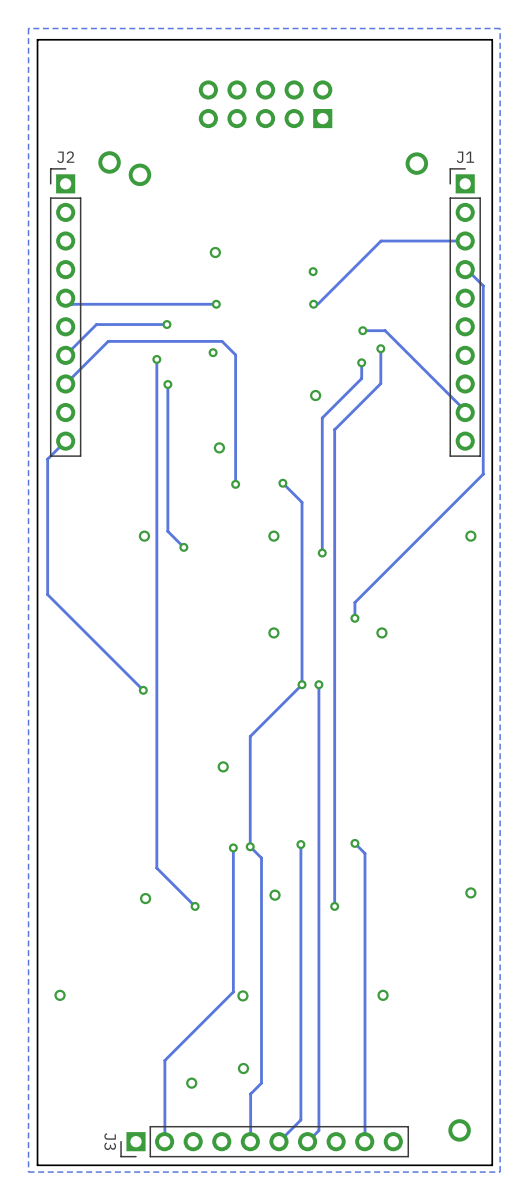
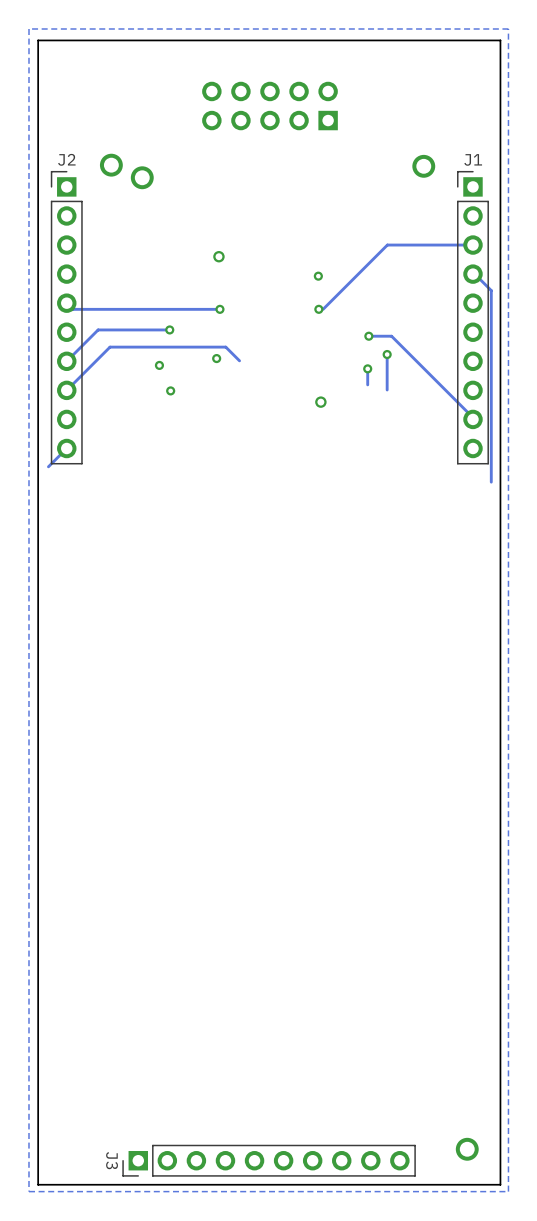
track: (235, 354) (235, 484) -> none
track: (156, 359) (156, 868) (195, 906) -> none
track: (361, 378) (322, 417) (322, 553) -> none
track: (380, 383) (334, 429) -> none
track: (167, 384) (167, 531) (183, 547) -> none
track: (334, 429) (334, 906) -> none
via: (219, 447) -> none
track: (47, 459) (47, 594) (143, 690) -> none
track: (483, 474) (354, 602) (354, 618) -> none
track: (282, 483) (302, 502) (302, 684) (250, 736) (250, 846) (261, 858) (261, 1083) (250, 1094) (250, 1141) -> none
via: (282, 483) -> none
via: (235, 484) -> none
via: (144, 536) -> none
via: (273, 536) -> none
via: (470, 536) -> none
via: (183, 547) -> none
via: (322, 553) -> none
via: (354, 618) -> none
via: (273, 632) -> none
via: (381, 632) -> none
via: (302, 684) -> none
track: (318, 684) (318, 1130) (307, 1141) -> none
via: (318, 684) -> none
via: (143, 690) -> none
via: (223, 766) -> none
track: (354, 843) (365, 853) (365, 1141) -> none
via: (354, 843) -> none
track: (300, 844) (300, 1120) (279, 1141) -> none
via: (300, 844) -> none
via: (250, 846) -> none
track: (233, 847) (233, 991) (164, 1060) (164, 1141) -> none
via: (233, 847) -> none
via: (470, 892) -> none
via: (275, 895) -> none
via: (145, 898) -> none
via: (195, 906) -> none
via: (334, 906) -> none
via: (60, 995) -> none
via: (242, 995) -> none
via: (383, 995) -> none
via: (243, 1068) -> none
via: (191, 1083) -> none

